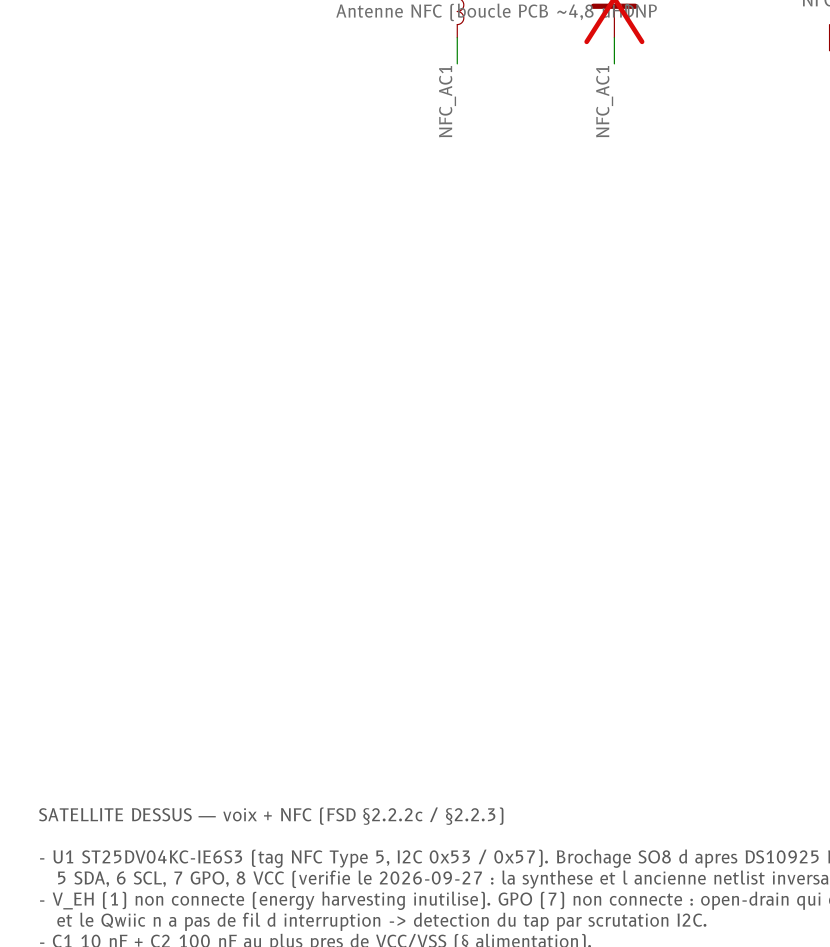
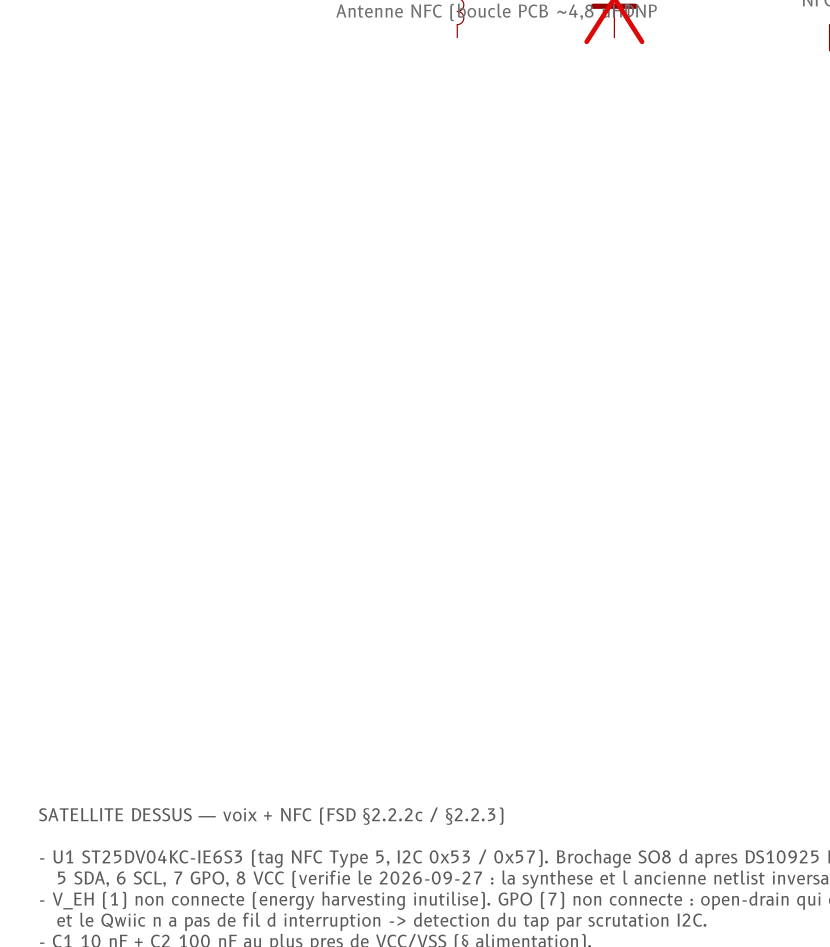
wire: (457, 37) (457, 63) -> none
wire: (614, 37) (614, 63) -> none
label: NFC_AC1 (447, 101) -> none
label: NFC_AC1 (604, 101) -> none

